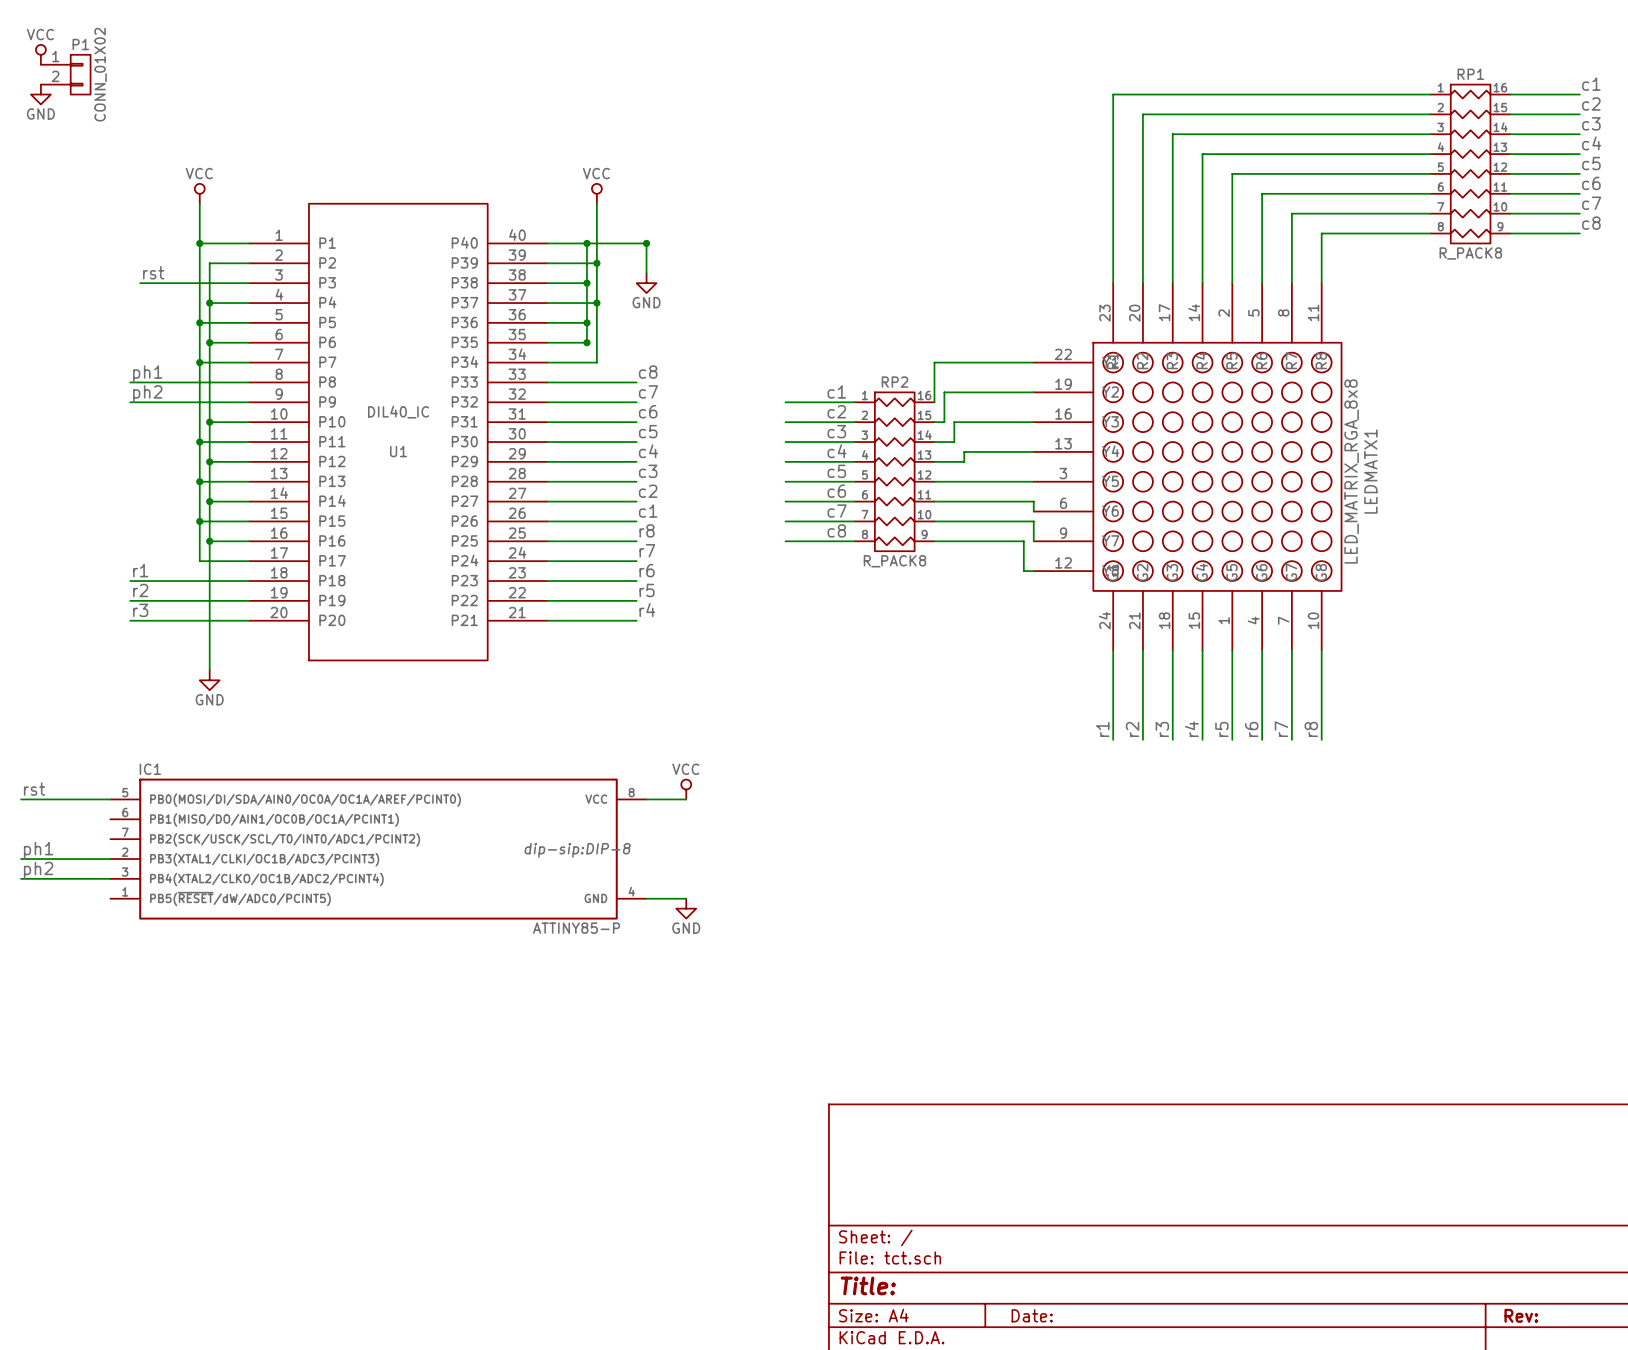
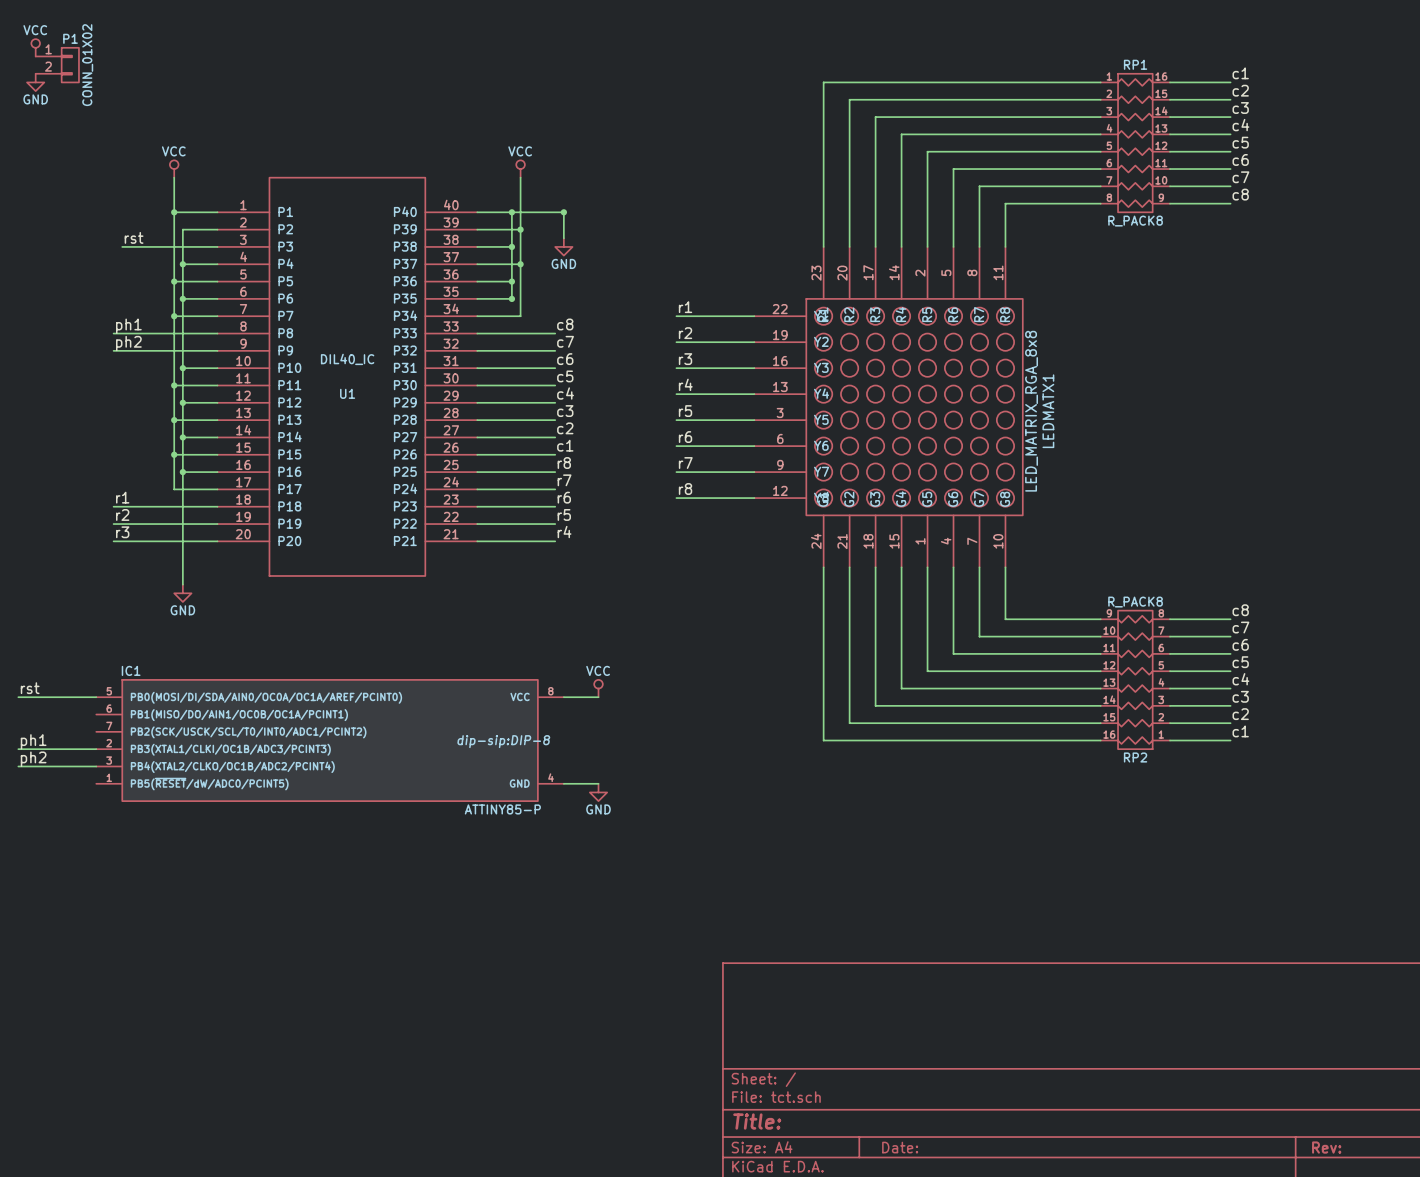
label position: c1 (1591, 84) -> c1 (1240, 73)
wire: (1113, 94) (1113, 283) -> (970, 82) (823, 82) (823, 246)
wire: (1411, 94) (1430, 94) -> none
wire: (1510, 94) (1579, 94) -> none
label position: c2 (1591, 103) -> c2 (1240, 90)
wire: (1142, 114) (1142, 283) -> (996, 99) (849, 99) (849, 246)
wire: (1411, 114) (1430, 114) -> none
wire: (1510, 114) (1579, 114) -> none
label position: c3 (1591, 123) -> c3 (1240, 108)
wire: (1172, 134) (1172, 283) -> (1022, 117) (875, 117) (875, 246)
wire: (1411, 134) (1430, 134) -> none
wire: (1510, 134) (1579, 134) -> none
label position: c4 (1591, 143) -> c4 (1240, 125)
wire: (1202, 154) (1202, 283) -> (1048, 134) (901, 134) (901, 246)
wire: (1411, 154) (1430, 154) -> none
wire: (1510, 154) (1579, 154) -> none
label position: c5 (1591, 163) -> c5 (1240, 142)
RP1 position: (1470, 164) -> (1135, 143)
wire: (1232, 173) (1232, 283) -> (1074, 151) (927, 151) (927, 246)
wire: (1411, 173) (1430, 173) -> none
wire: (1510, 173) (1579, 173) -> none
label position: c6 (1591, 183) -> c6 (1240, 159)
wire: none -> (1100, 169) (953, 169) (953, 246)
wire: (1341, 193) (1262, 193) (1262, 283) -> none
wire: (1411, 193) (1430, 193) -> none
wire: (1510, 193) (1579, 193) -> none
label position: c7 (1591, 203) -> c7 (1240, 177)
wire: none -> (1100, 186) (979, 186) (979, 246)
wire: (1341, 213) (1291, 213) (1291, 283) -> none
wire: (1411, 213) (1430, 213) -> none
wire: (1510, 213) (1579, 213) -> none
label position: c8 (1591, 223) -> c8 (1240, 194)
wire: none -> (1100, 203) (1005, 203) (1005, 246)
wire: (1341, 233) (1321, 233) (1321, 283) -> none
wire: (1411, 233) (1430, 233) -> none
wire: (1510, 233) (1579, 233) -> none
label: none -> r1 (685, 307)
wire: none -> (676, 316) (754, 316)
wire: (1033, 362) (934, 362) (934, 402) -> none
label: none -> r2 (685, 333)
label: c1 (836, 391) -> none
wire: none -> (676, 342) (754, 342)
wire: (1033, 392) (944, 392) (944, 422) (934, 422) -> none
wire: (785, 402) (855, 402) -> none
label: none -> r3 (685, 359)
label: c2 (836, 411) -> none
wire: none -> (676, 368) (685, 368)
wire: (1033, 422) (954, 422) (954, 442) (934, 442) -> none
label: c3 (836, 431) -> none
label: none -> r4 (685, 384)
wire: (785, 442) (855, 442) -> none
wire: none -> (676, 394) (754, 394)
label: c4 (837, 451) -> none
wire: (1033, 451) (964, 451) (964, 461) (934, 461) -> none
wire: (785, 461) (855, 461) -> none
LEDMATX1 position: (1187, 466) -> (888, 407)
label: none -> r5 (685, 411)
label: c5 (836, 471) -> none
RP2 rotation: 0° (894, 471) -> 180° (1135, 679)
RP2 position: (894, 471) -> (1135, 679)
wire: none -> (676, 420) (685, 420)
wire: (934, 481) (1033, 481) -> none
label: c6 (836, 491) -> none
wire: (785, 501) (855, 501) -> none
label: none -> r6 (685, 437)
wire: (934, 501) (1033, 501) (1033, 511) -> none
wire: none -> (676, 446) (754, 446)
label: c7 (837, 511) -> none
wire: (785, 521) (855, 521) -> none
wire: (934, 521) (1033, 521) (1033, 541) -> none
label: none -> r7 (685, 463)
label: c8 (836, 530) -> none
wire: none -> (676, 472) (685, 472)
wire: (934, 541) (1023, 541) (1023, 571) (1033, 571) -> none
label: none -> r8 (685, 488)
wire: none -> (676, 498) (754, 498)
wire: none -> (823, 567) (823, 740) (1100, 740)
wire: none -> (849, 567) (849, 723) (1100, 723)
wire: none -> (875, 567) (875, 705) (1100, 705)
wire: none -> (901, 567) (901, 688) (1100, 688)
wire: none -> (927, 567) (927, 671) (1100, 671)
wire: none -> (953, 567) (953, 653) (1100, 653)
wire: (1113, 650) (1113, 739) -> none
wire: none -> (979, 567) (979, 636) (1100, 636)
wire: (1142, 650) (1142, 739) -> none
wire: none -> (1005, 567) (1005, 619) (1100, 619)
wire: (1172, 650) (1172, 739) -> none
wire: (1202, 650) (1202, 739) -> none
wire: (1232, 650) (1232, 739) -> none
wire: (1262, 650) (1262, 739) -> none
wire: (1291, 650) (1291, 739) -> none
wire: (1321, 650) (1321, 739) -> none
label: none -> c8 (1240, 610)
wire: none -> (1169, 619) (1230, 619)
label: none -> c7 (1240, 627)
label: r1 (1102, 729) -> none
label: r2 (1132, 729) -> none
label: r3 (1162, 729) -> none
label: r4 (1191, 729) -> none
label: r5 (1221, 729) -> none
label: r6 (1251, 729) -> none
label: r7 (1281, 729) -> none
label: r8 (1311, 729) -> none
wire: none -> (1169, 636) (1230, 636)
label: none -> c6 (1240, 644)
wire: none -> (1169, 653) (1230, 653)
label: none -> c5 (1240, 662)
wire: none -> (1169, 671) (1230, 671)
label: none -> c4 (1240, 679)
wire: none -> (1169, 688) (1230, 688)
label: none -> c3 (1240, 696)
wire: none -> (1169, 705) (1230, 705)
label: none -> c2 (1240, 714)
wire: none -> (1169, 723) (1230, 723)
label: none -> c1 (1240, 731)
wire: none -> (1169, 740) (1230, 740)

